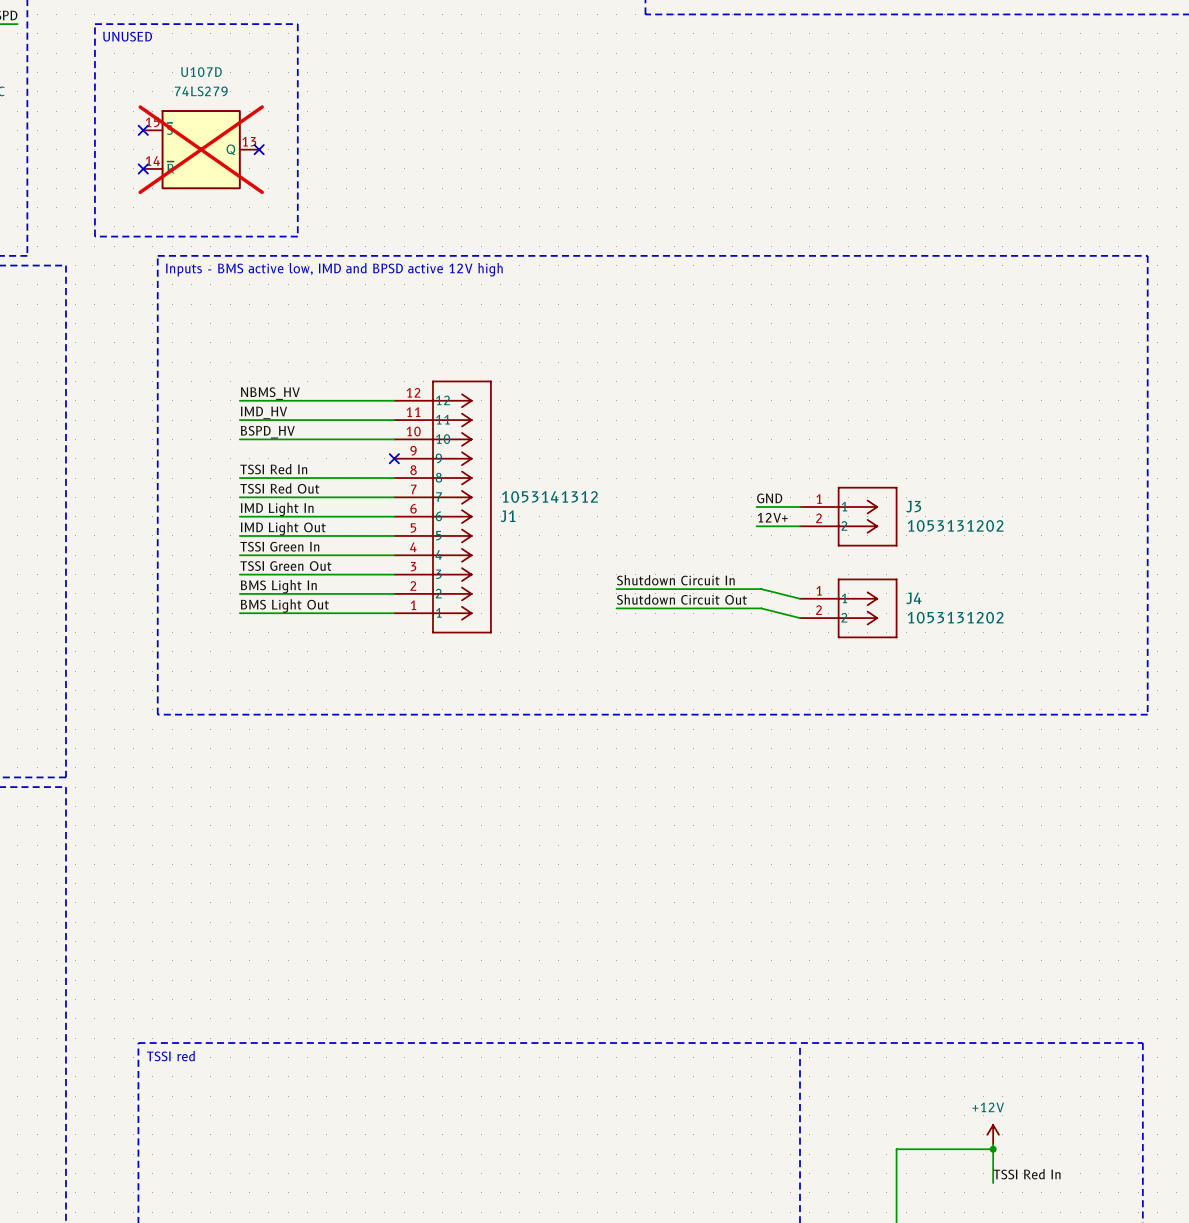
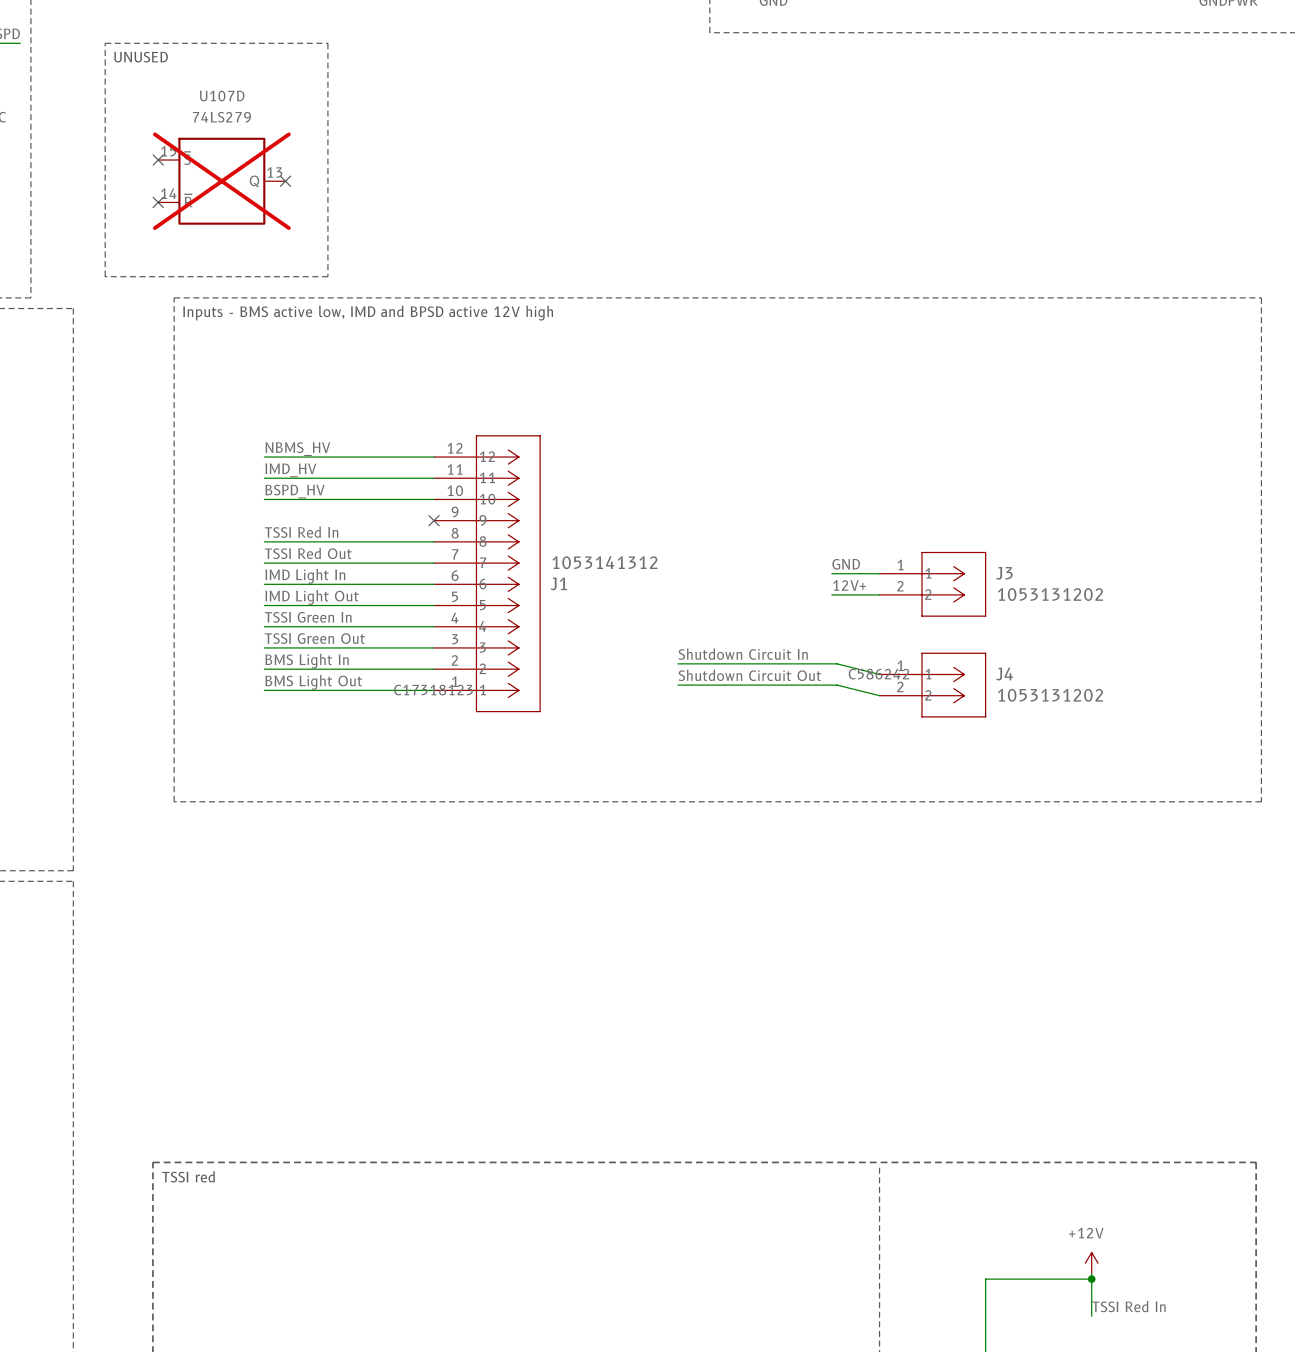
J4 text: none -> C586242 (879, 674)
J1 text: none -> C17318123 (433, 690)

